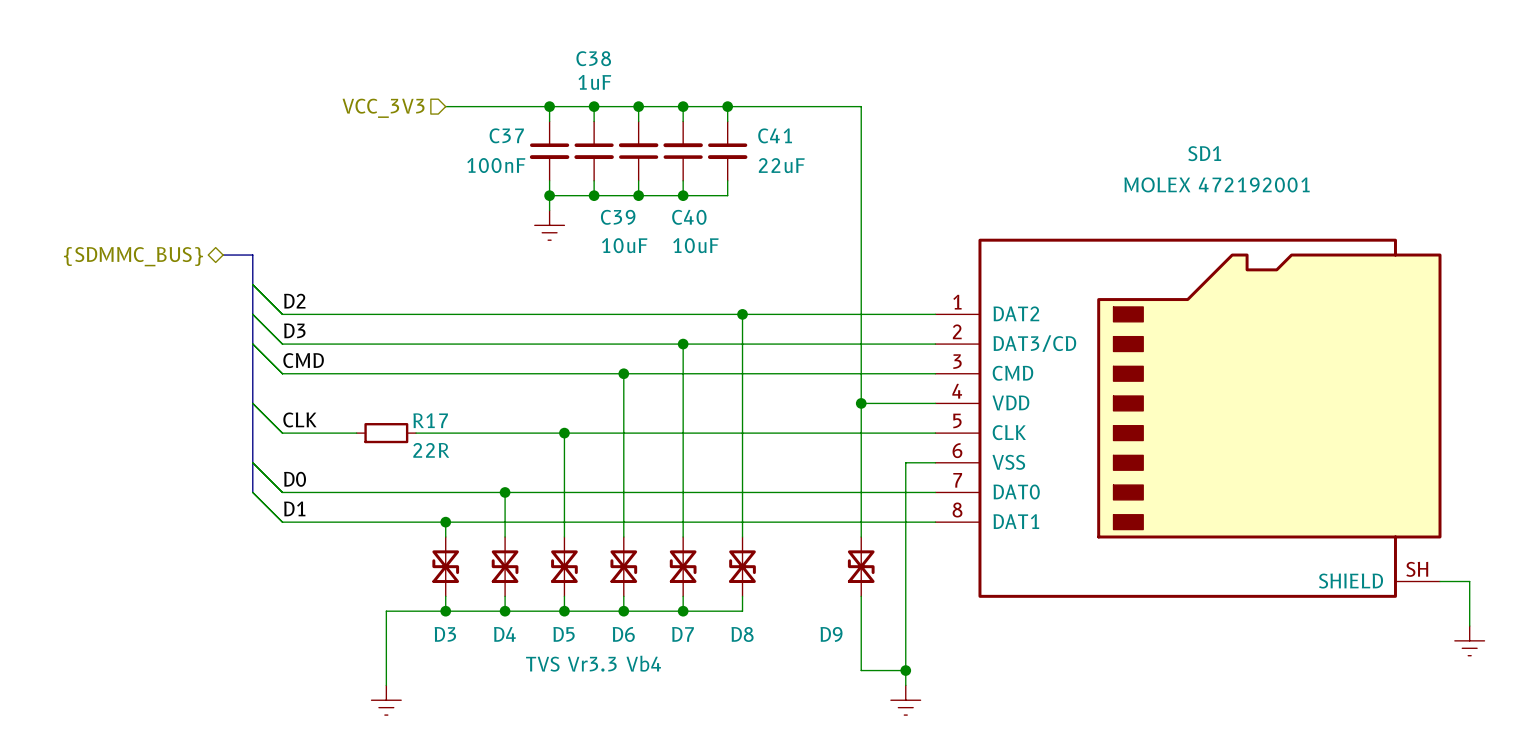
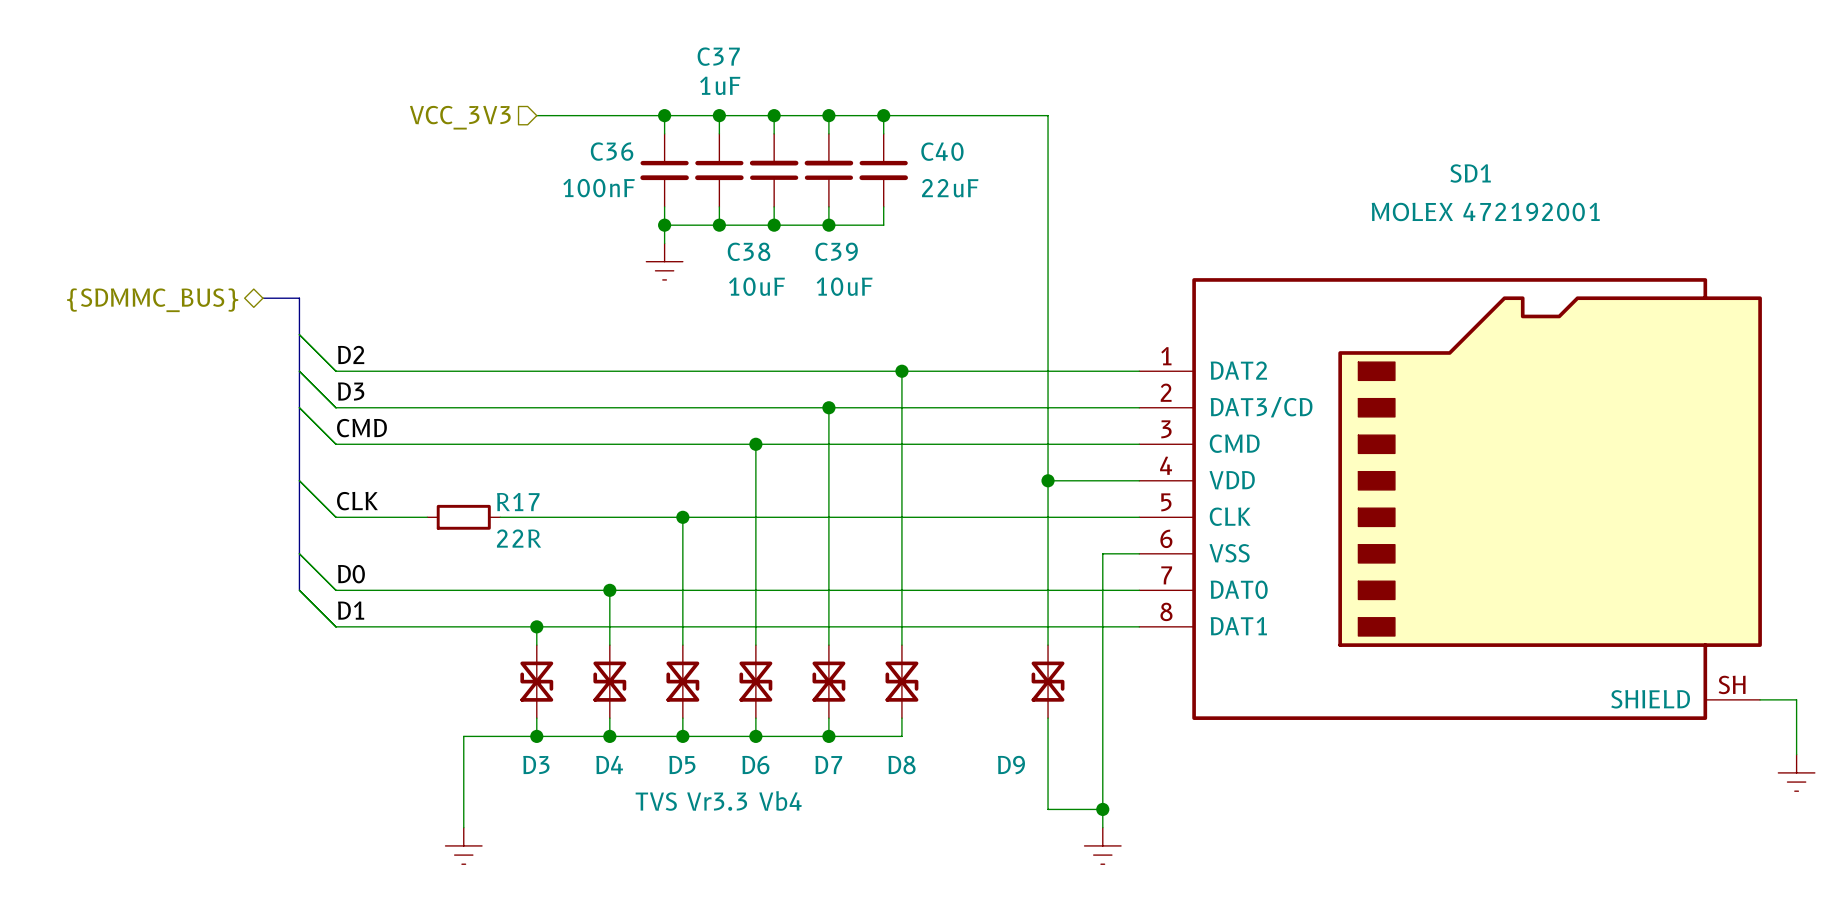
C38 name: C38 (593, 58) -> C37 (718, 56)
C37 name: C37 (506, 135) -> C36 (612, 151)
C41 name: C41 (775, 135) -> C40 (942, 151)
C39 name: C39 (618, 217) -> C38 (749, 251)
C40 name: C40 (689, 217) -> C39 (836, 251)

